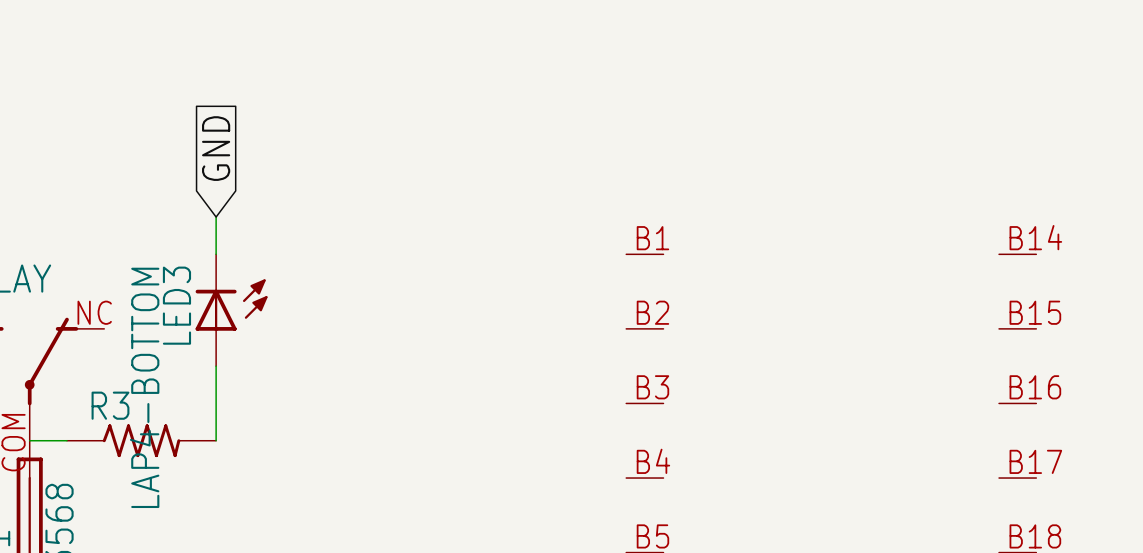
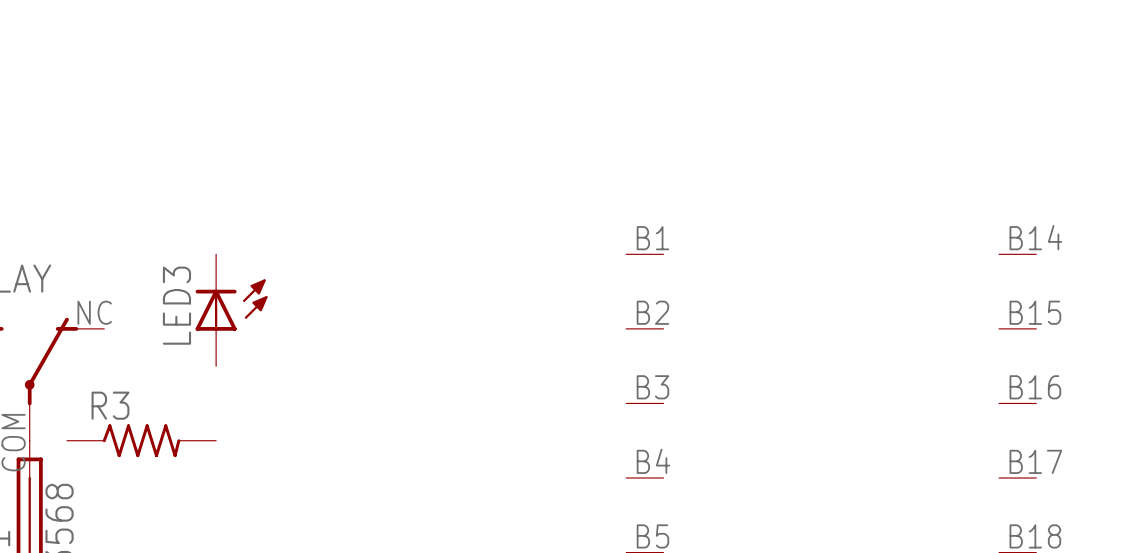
global label: GND (216, 148) -> none
wire: (216, 217) (216, 254) -> none
wire: (216, 366) (216, 440) -> none
LED3 value: LAP4-BOTTOM (144, 387) -> none
wire: (29, 440) (66, 440) -> none

